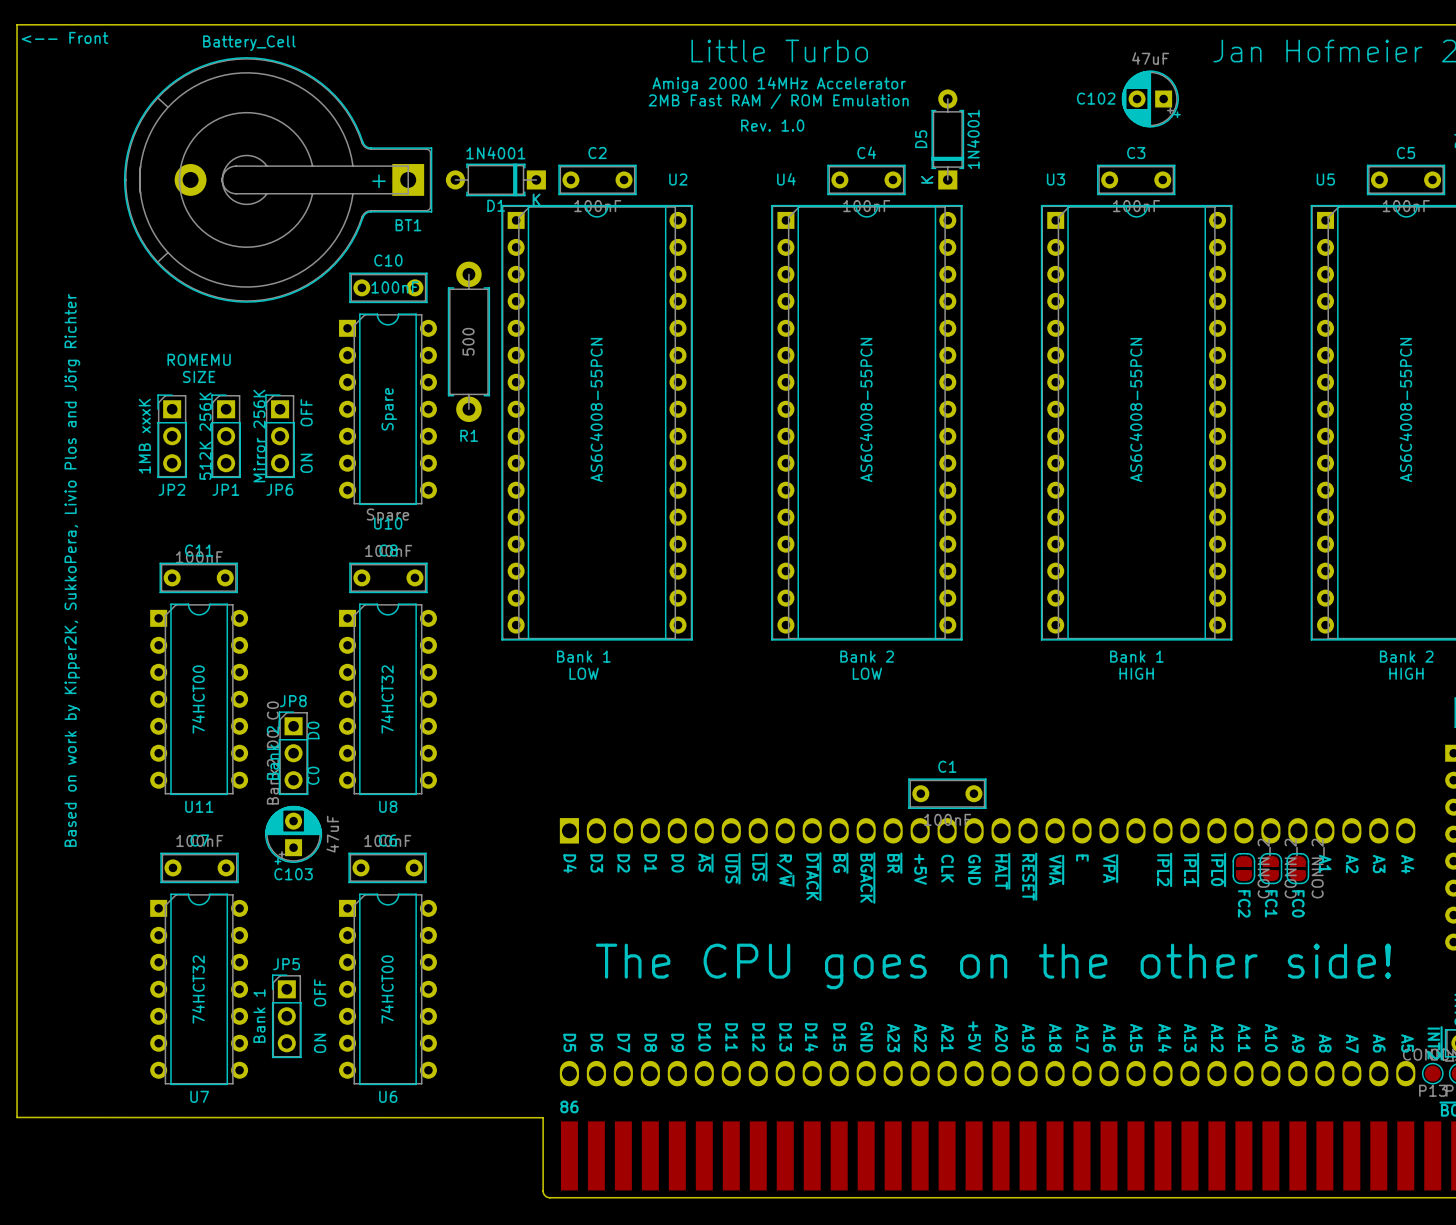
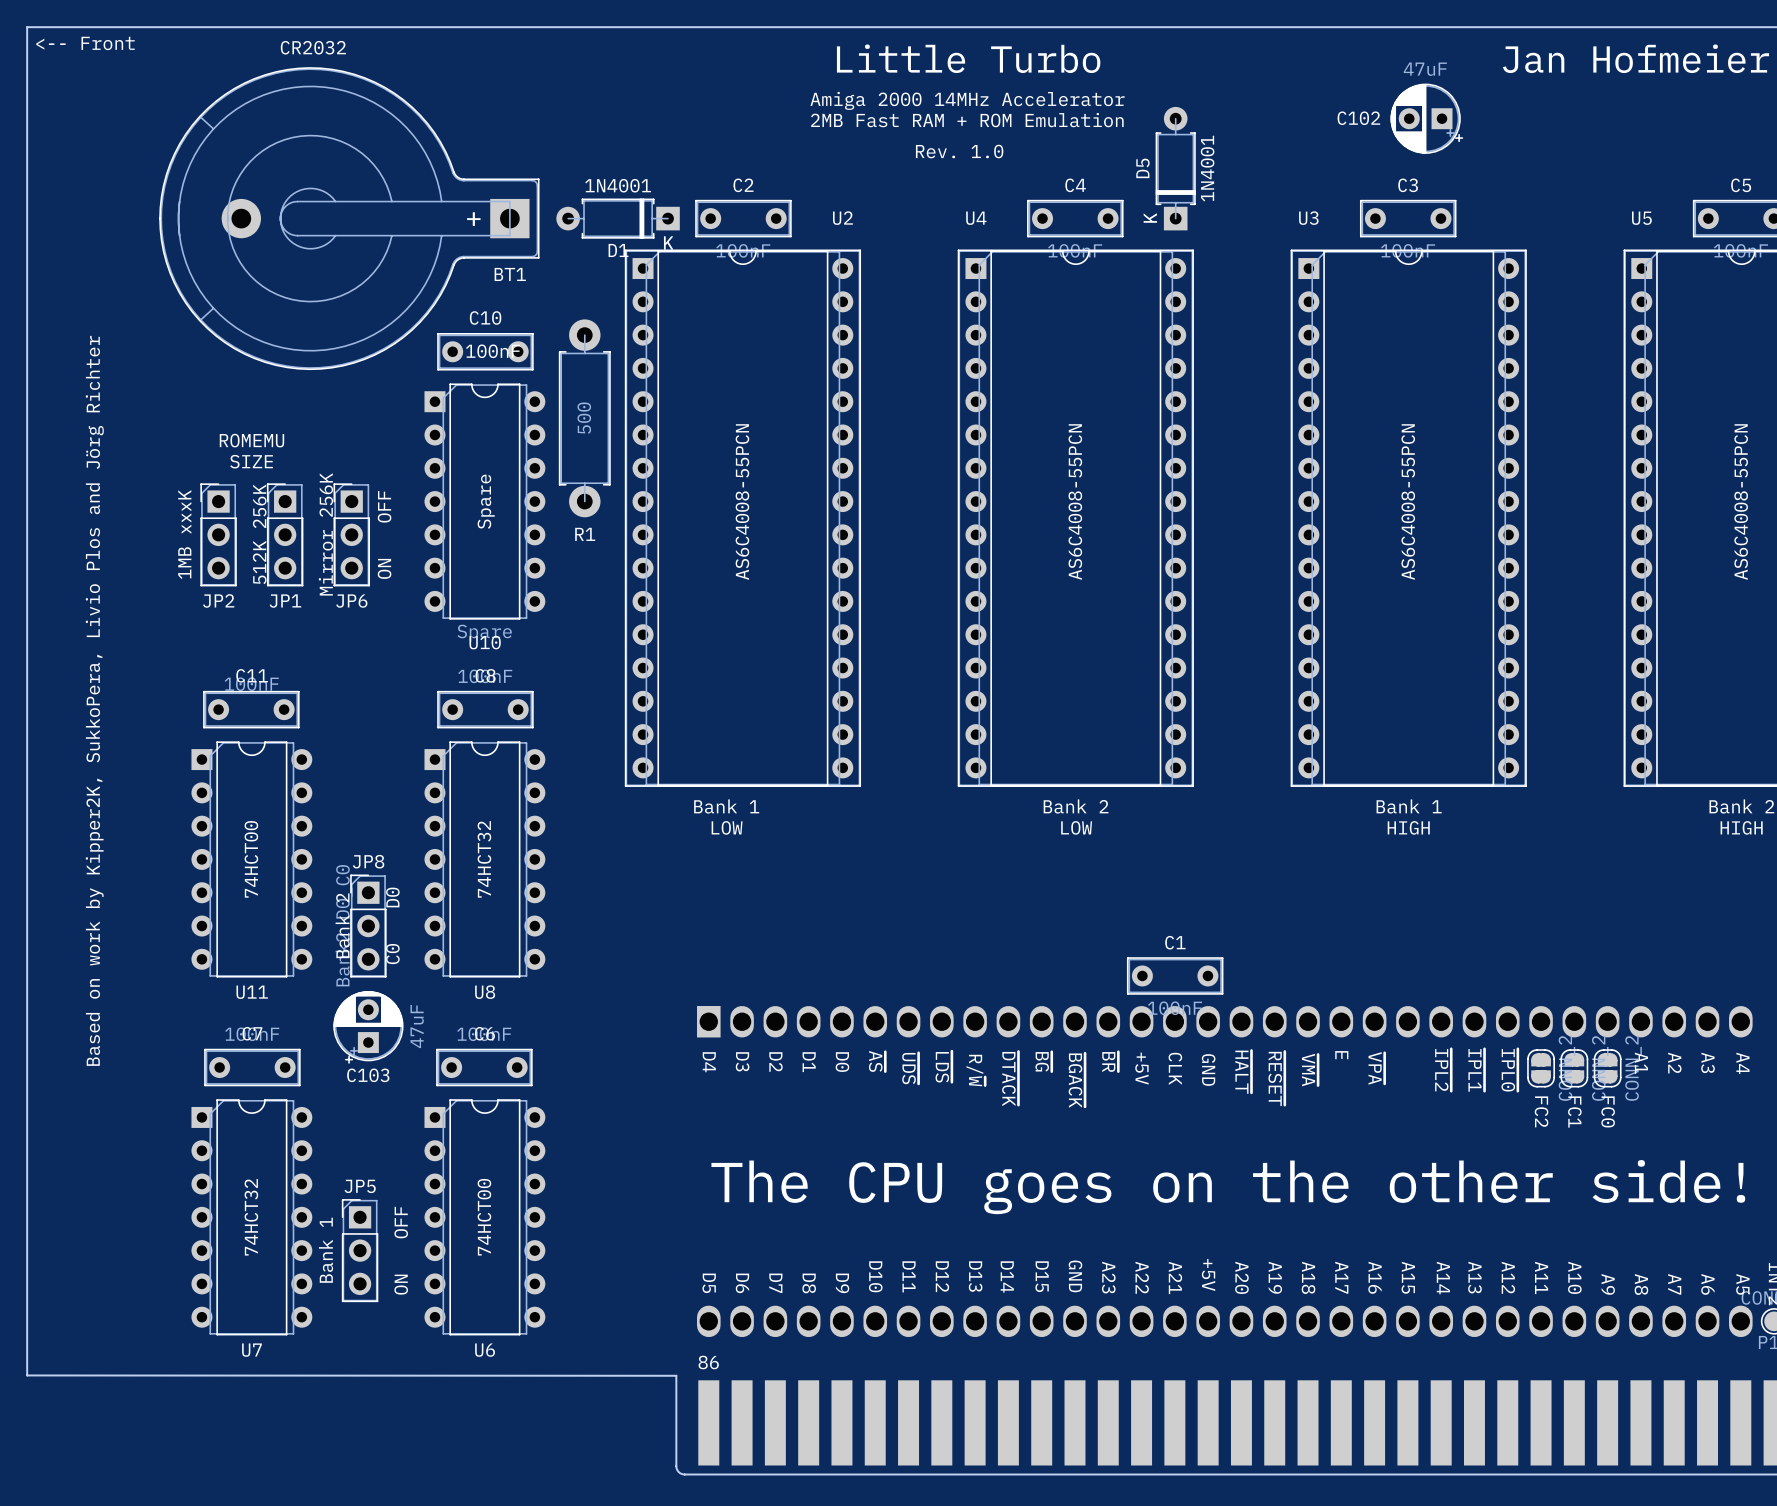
BT1 value: Battery_Cell (249, 43) -> CR2032 (313, 47)
text: 2MB Fast RAM / ROM Emulation (778, 101) -> 2MB Fast RAM + ROM Emulation (967, 120)

